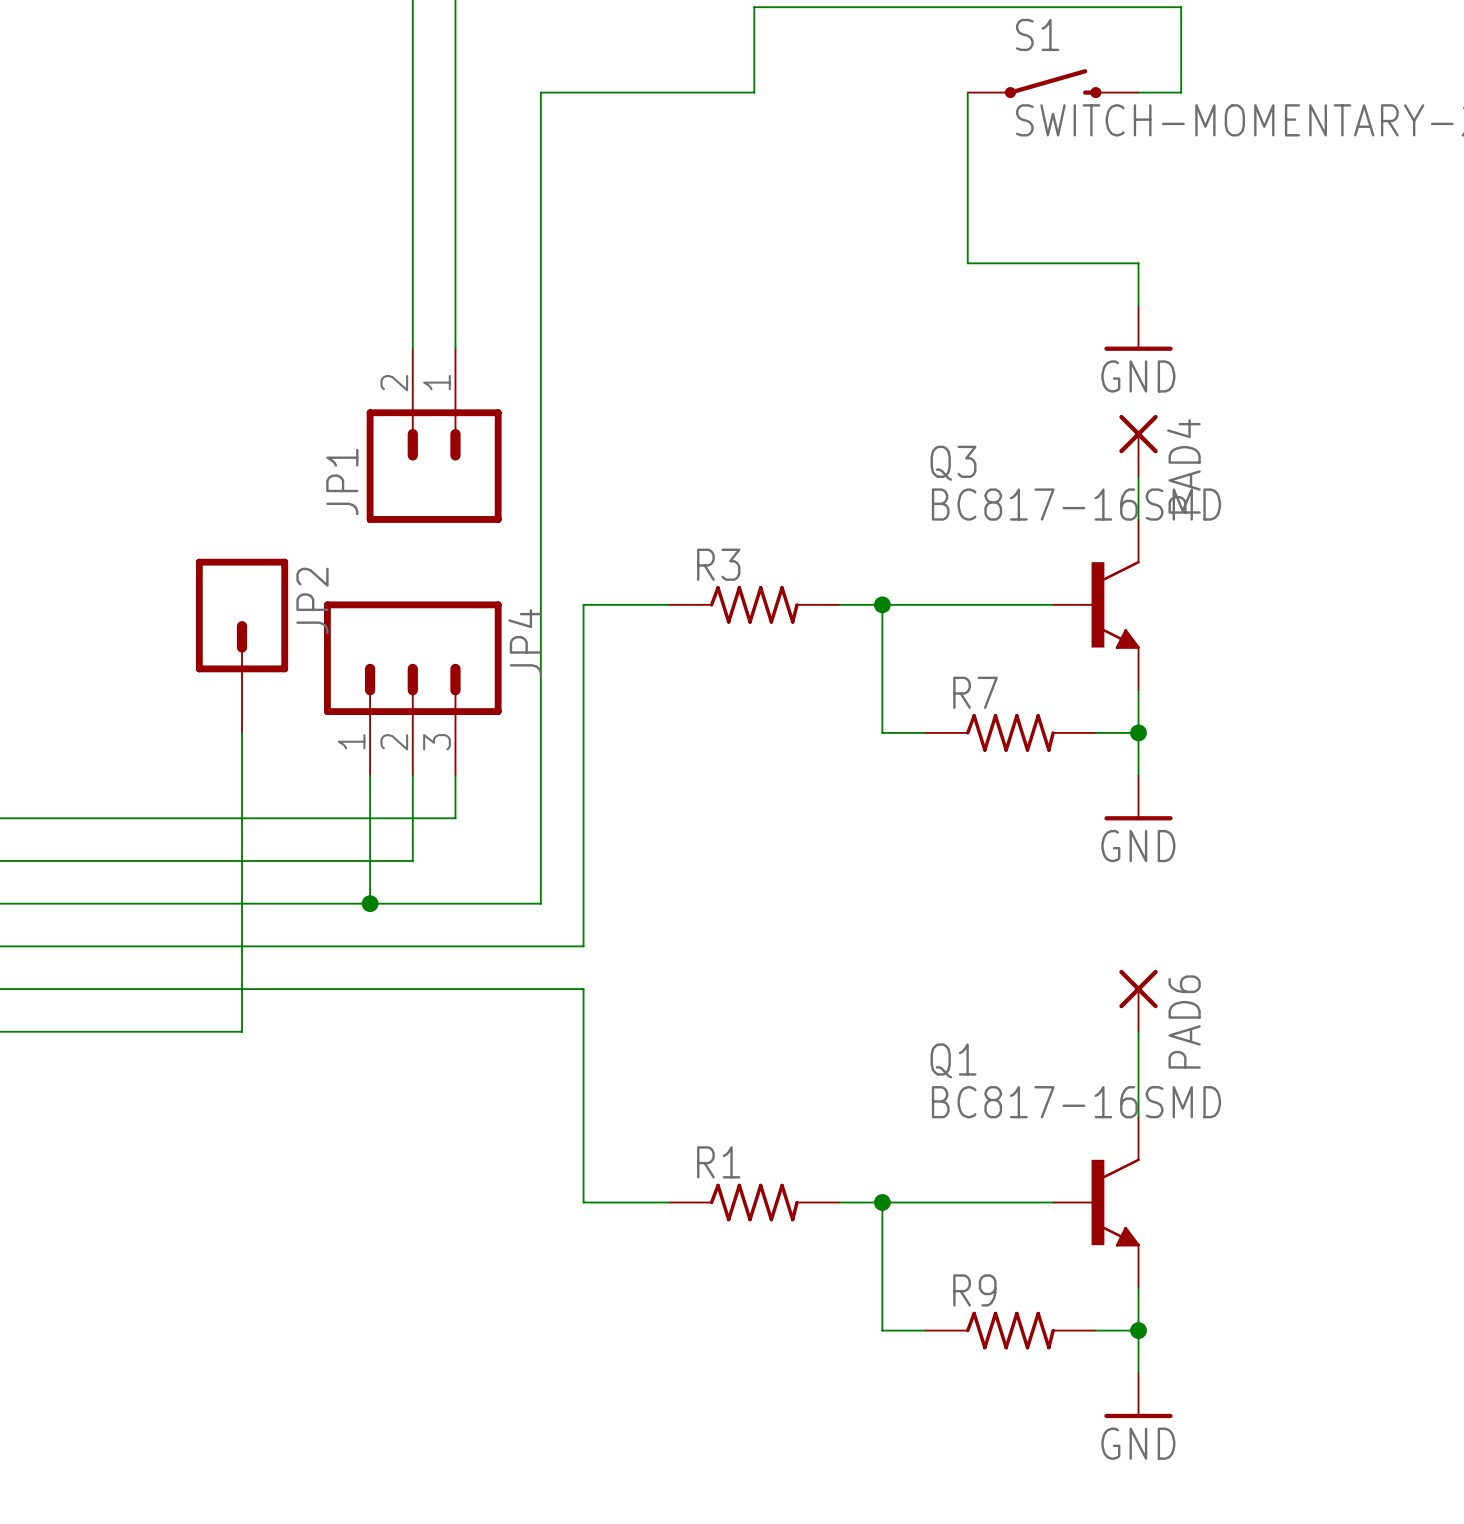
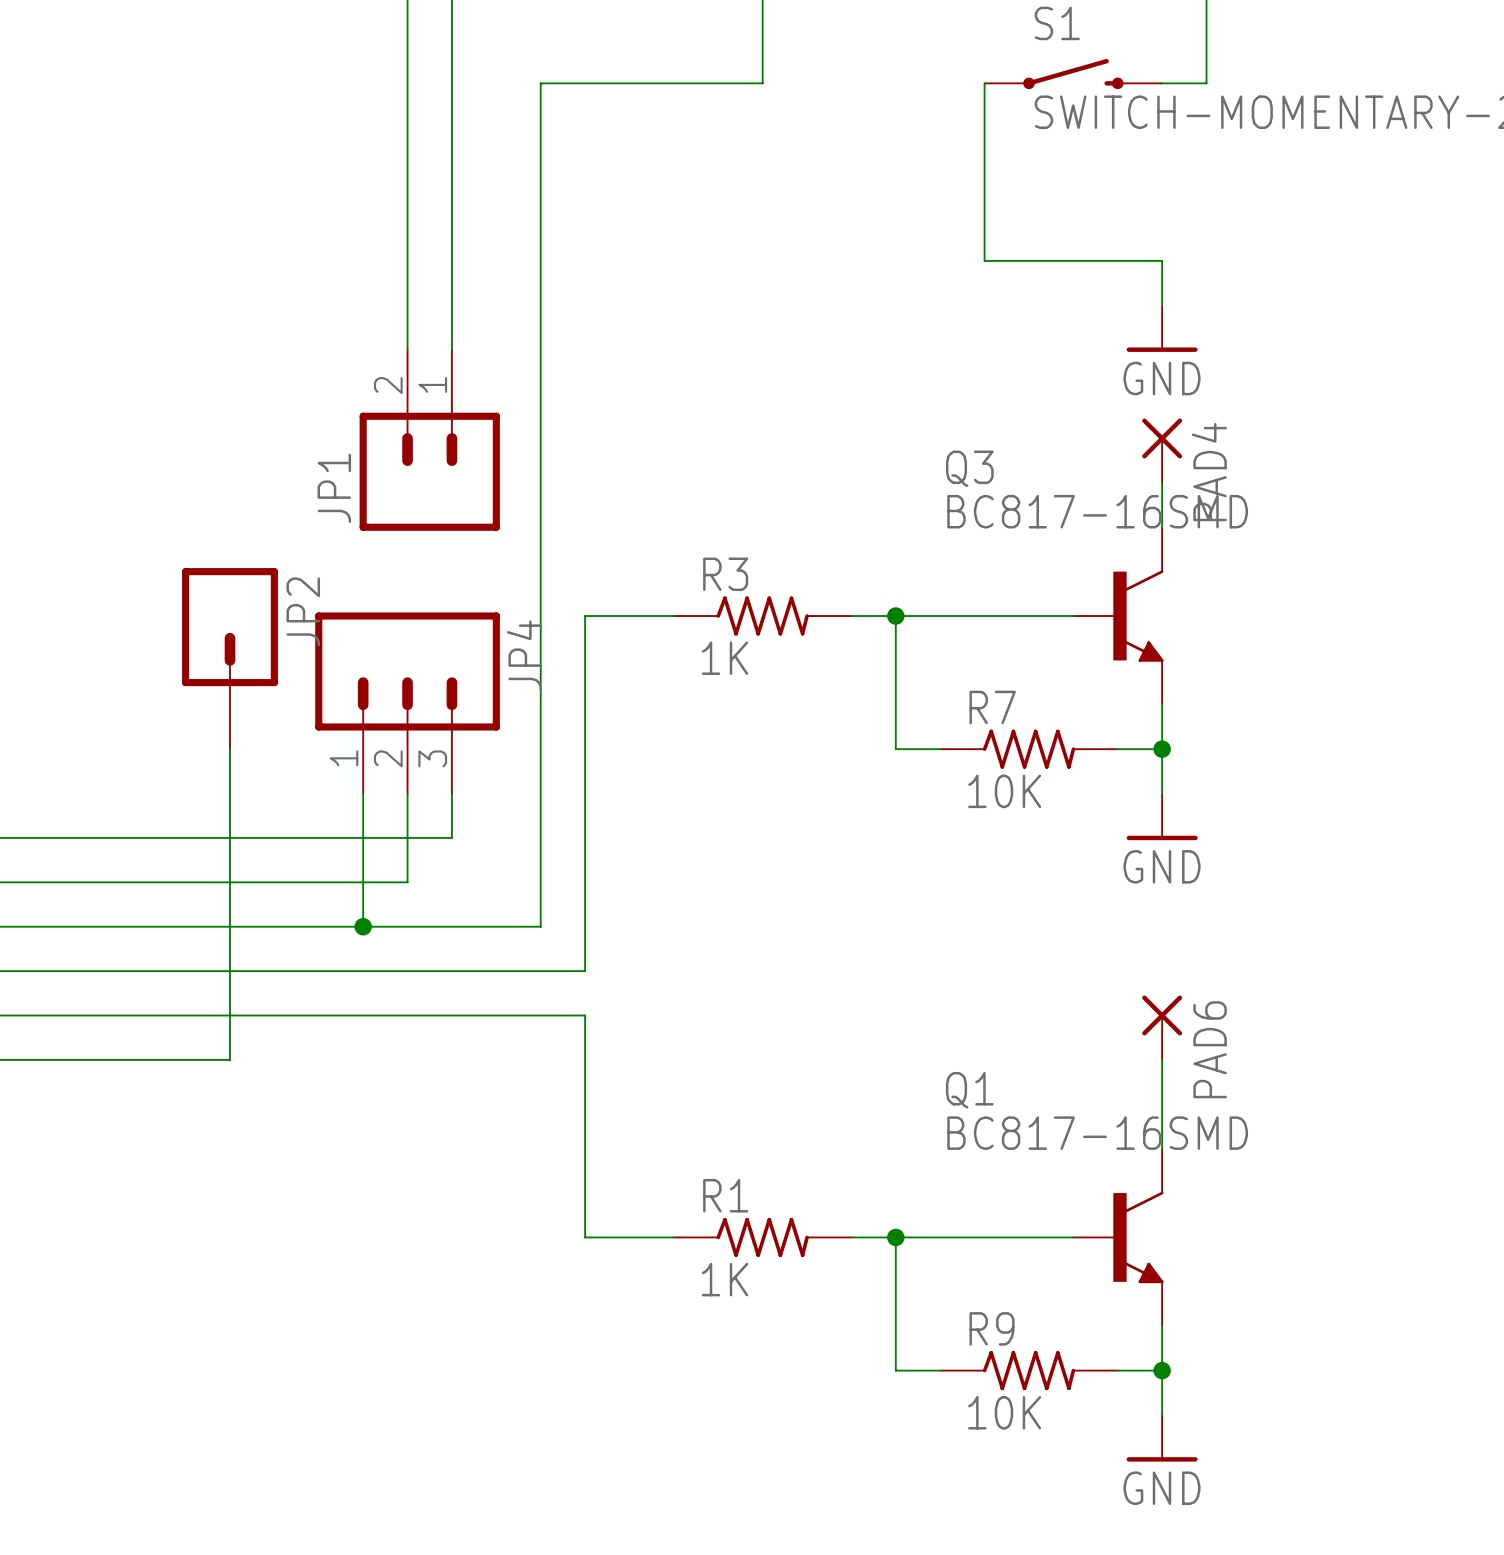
R3 value: none -> 1K (725, 658)
R7 value: none -> 10K (1004, 791)
R1 value: none -> 1K (725, 1279)
R9 value: none -> 10K (1004, 1412)

